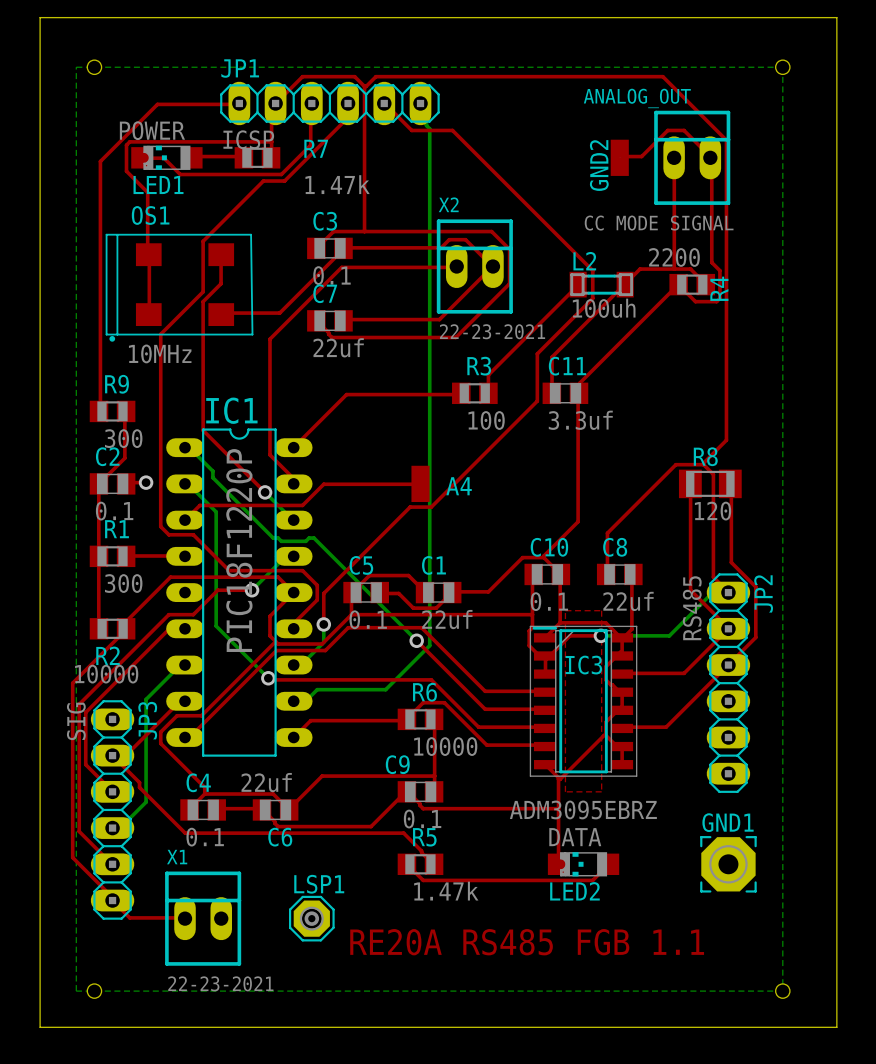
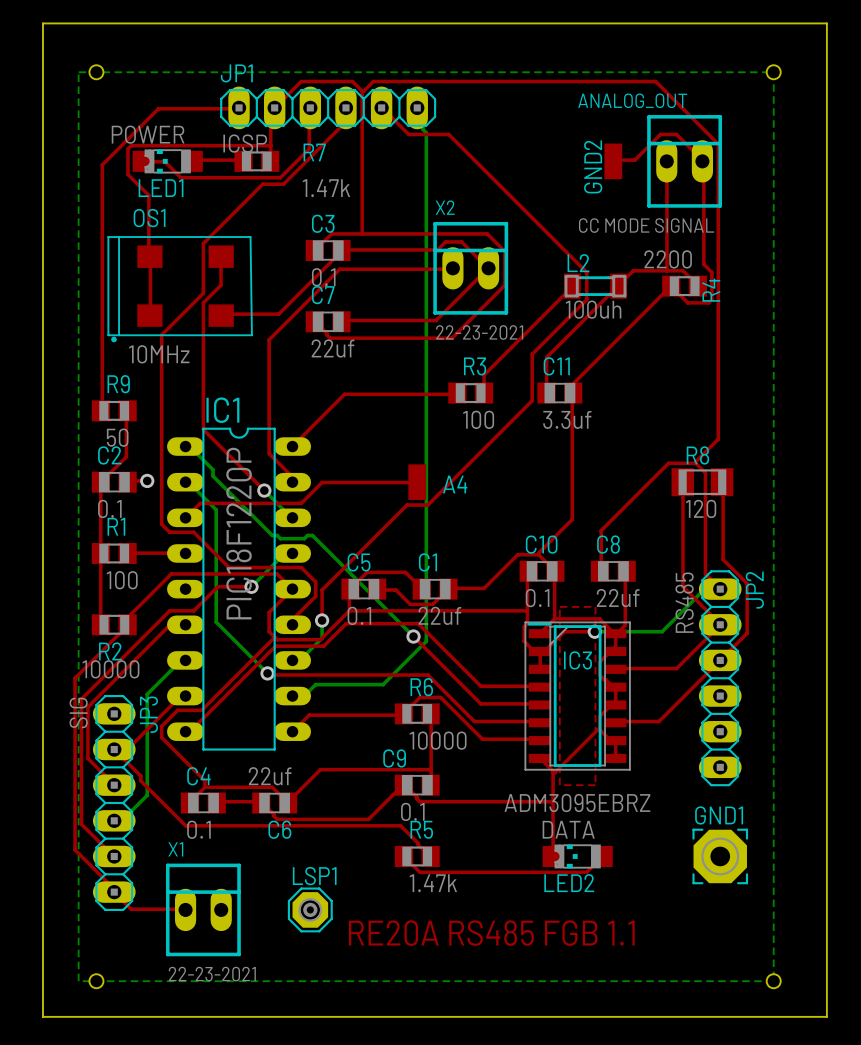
R9 value: 300 (123, 438) -> 50 (117, 437)
R1 value: 300 (123, 583) -> 100 (122, 580)

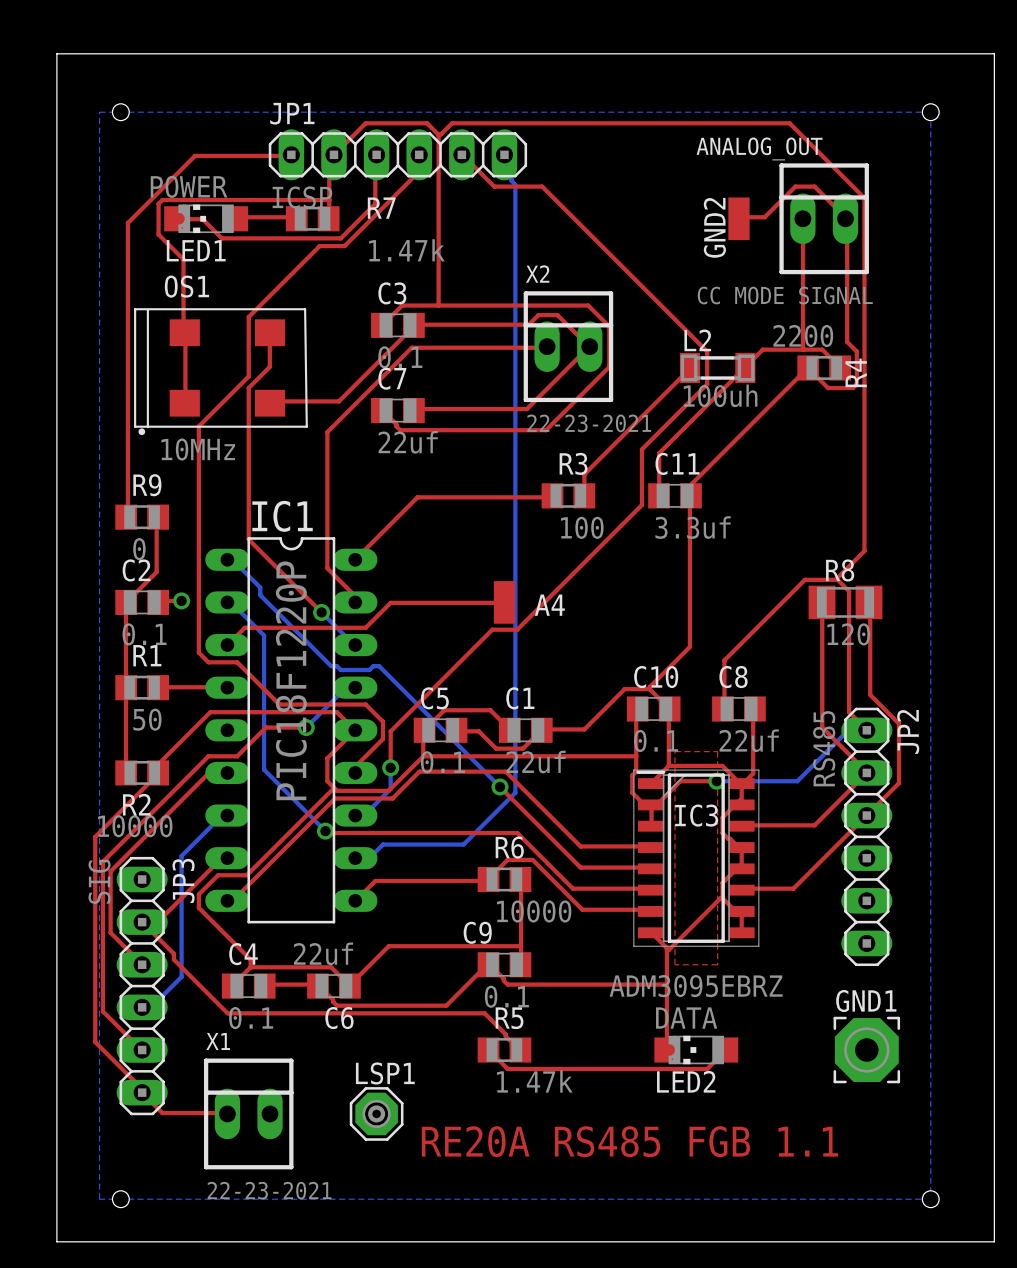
R9 value: 50 (117, 437) -> 0 (139, 549)
R1 value: 100 (122, 580) -> 50 (147, 719)

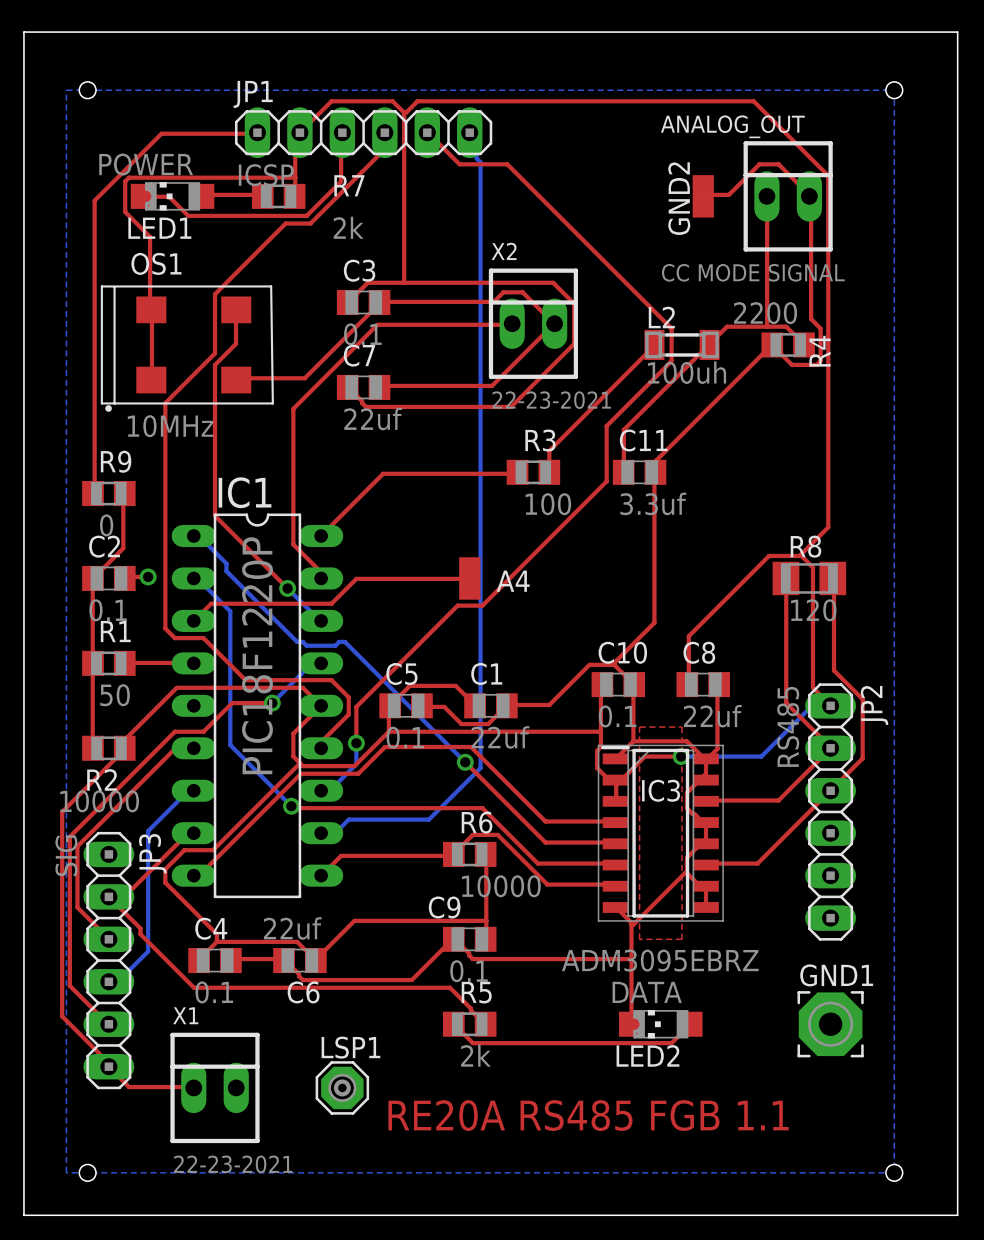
R7 value: 1.47k (406, 250) -> 2k (348, 227)
R5 value: 1.47k (534, 1081) -> 2k (475, 1055)

